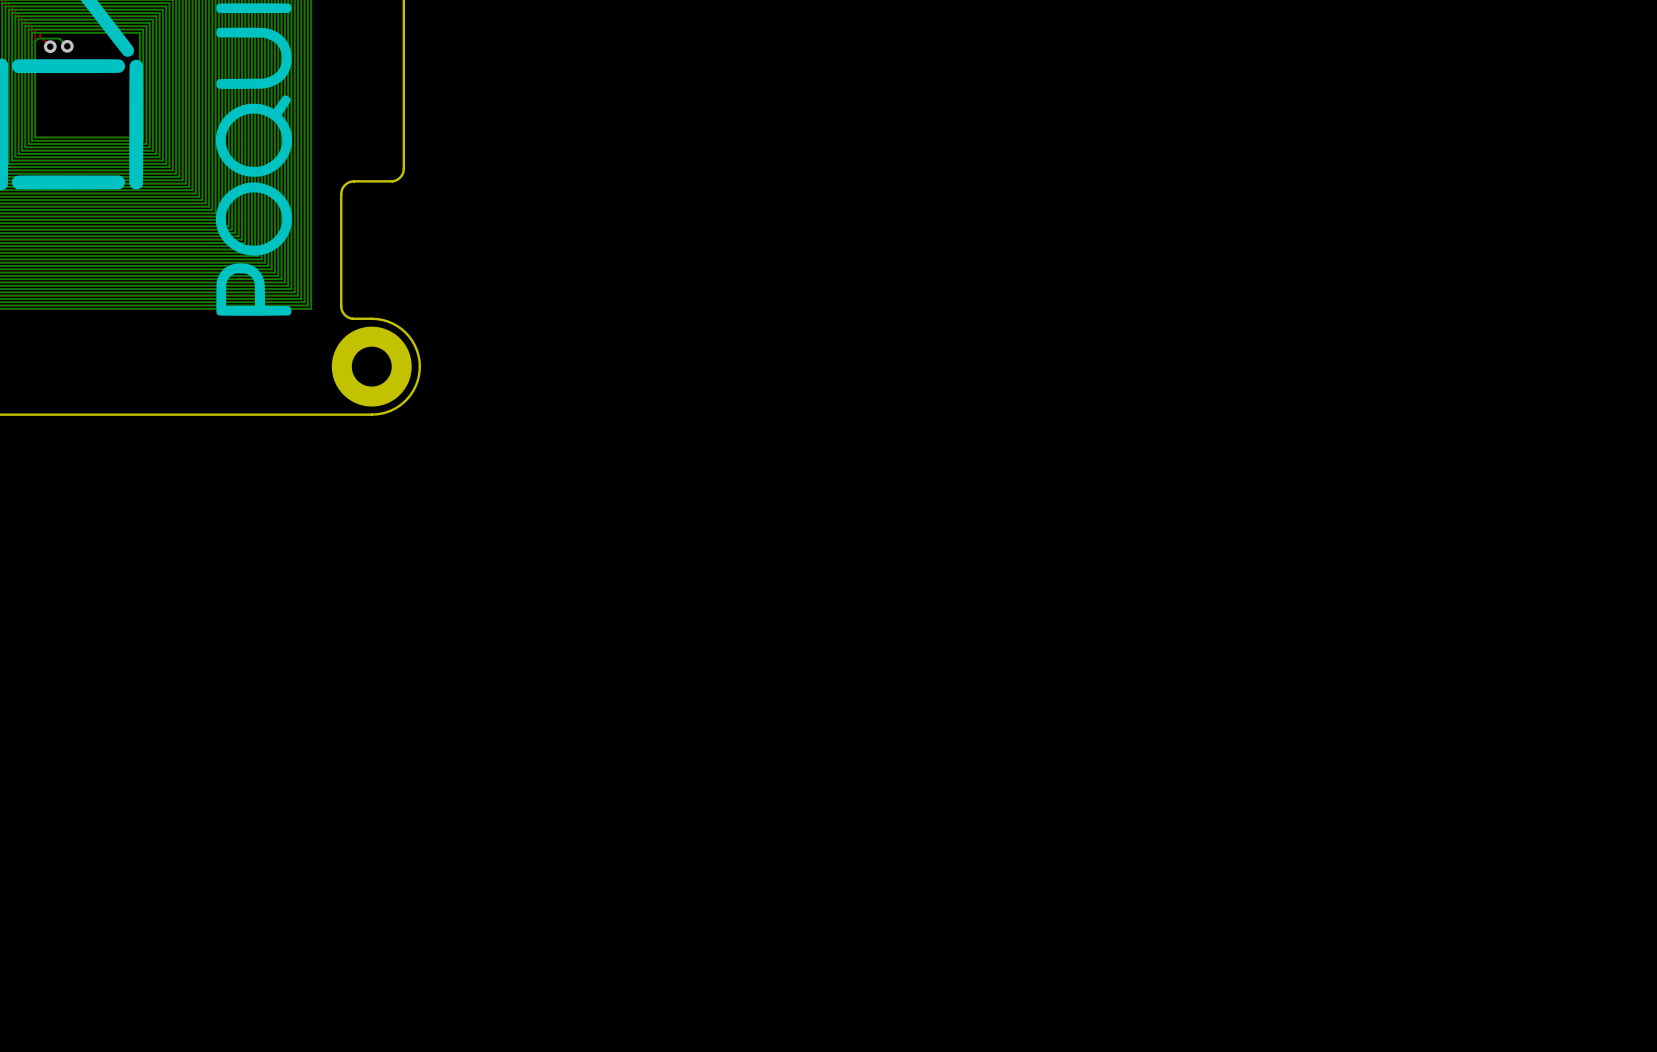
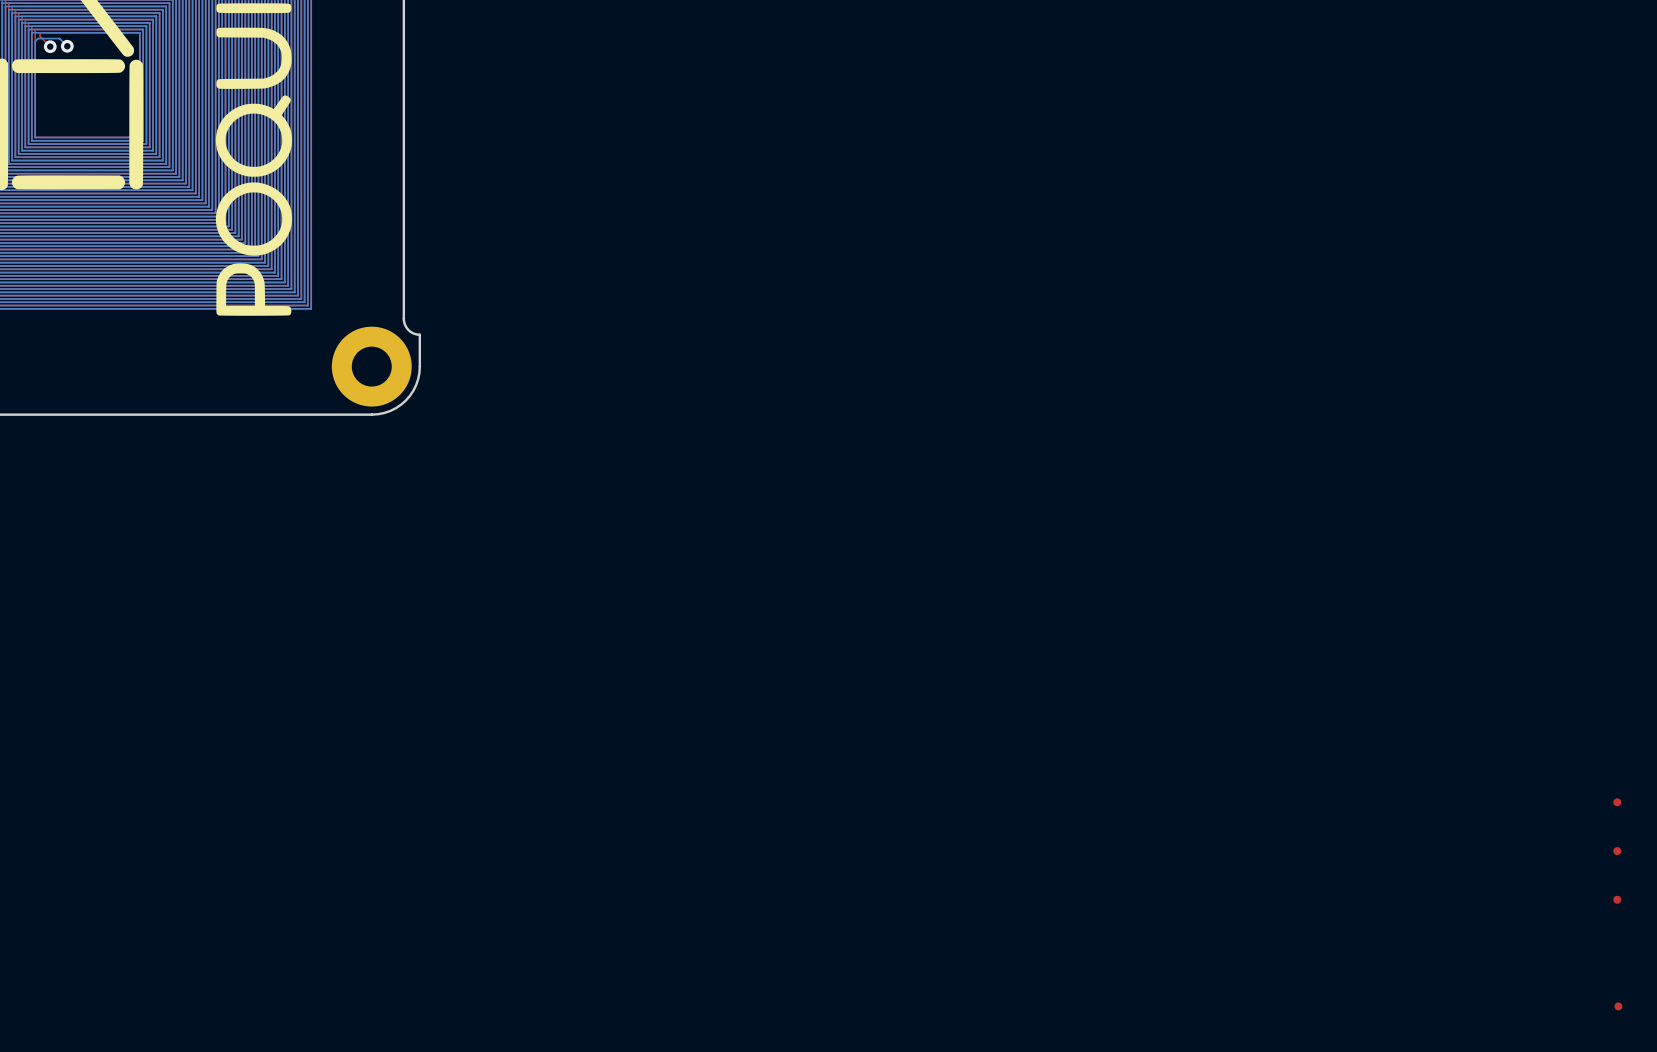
board edge: (403, 168) (401, 176) (395, 180) (352, 181) (346, 184) (342, 189) (341, 307) (344, 314) (349, 318) (382, 319) (401, 329) (415, 345) (419, 366) -> (403, 168) (403, 320) (409, 331) (419, 334) (419, 366)
part: none -> (1617, 802)
part: none -> (1617, 851)
part: none -> (1617, 899)
part: none -> (1618, 1006)

